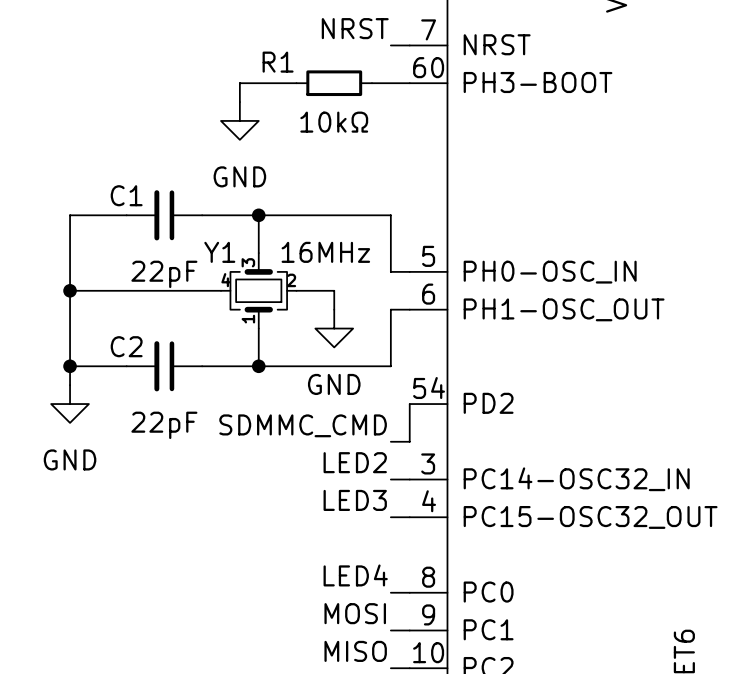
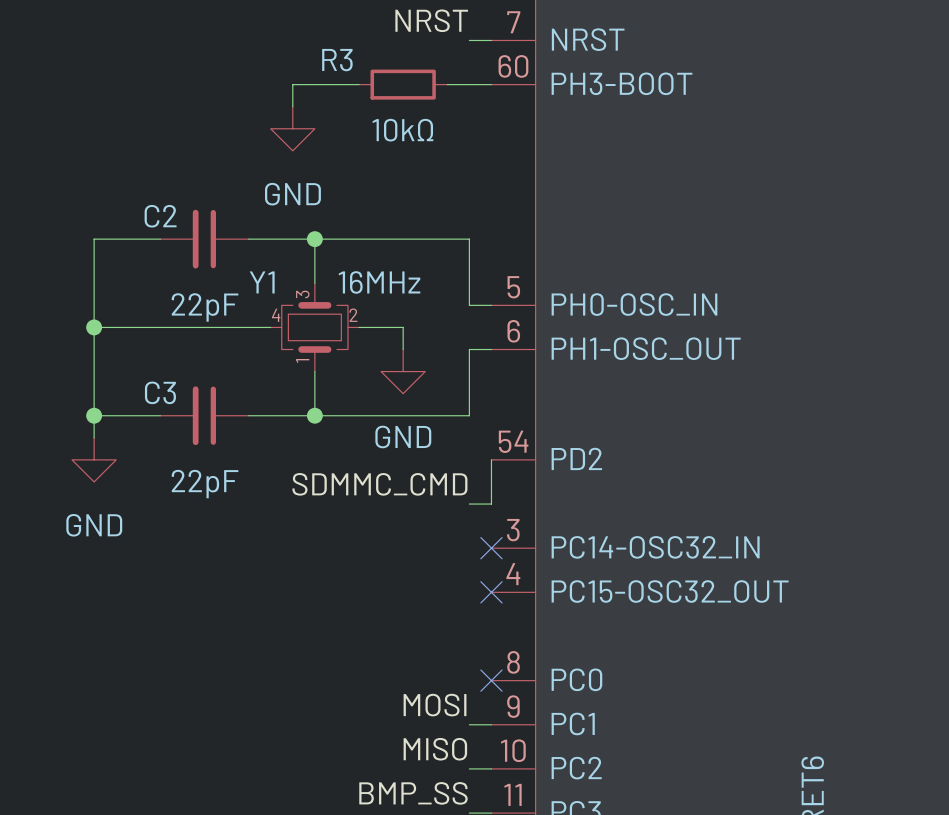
R1 name: R1 (278, 62) -> R3 (337, 60)
C1 name: C1 (126, 195) -> C2 (160, 216)
C2 name: C2 (126, 346) -> C3 (160, 392)
label: LED2 (355, 462) -> none
wire: (390, 479) (409, 479) -> none
no-connect mark: none -> (491, 548)
label: LED3 (355, 500) -> none
wire: (390, 517) (409, 517) -> none
no-connect mark: none -> (491, 592)
label: LED4 (355, 575) -> none
wire: (390, 592) (409, 592) -> none
no-connect mark: none -> (491, 680)

